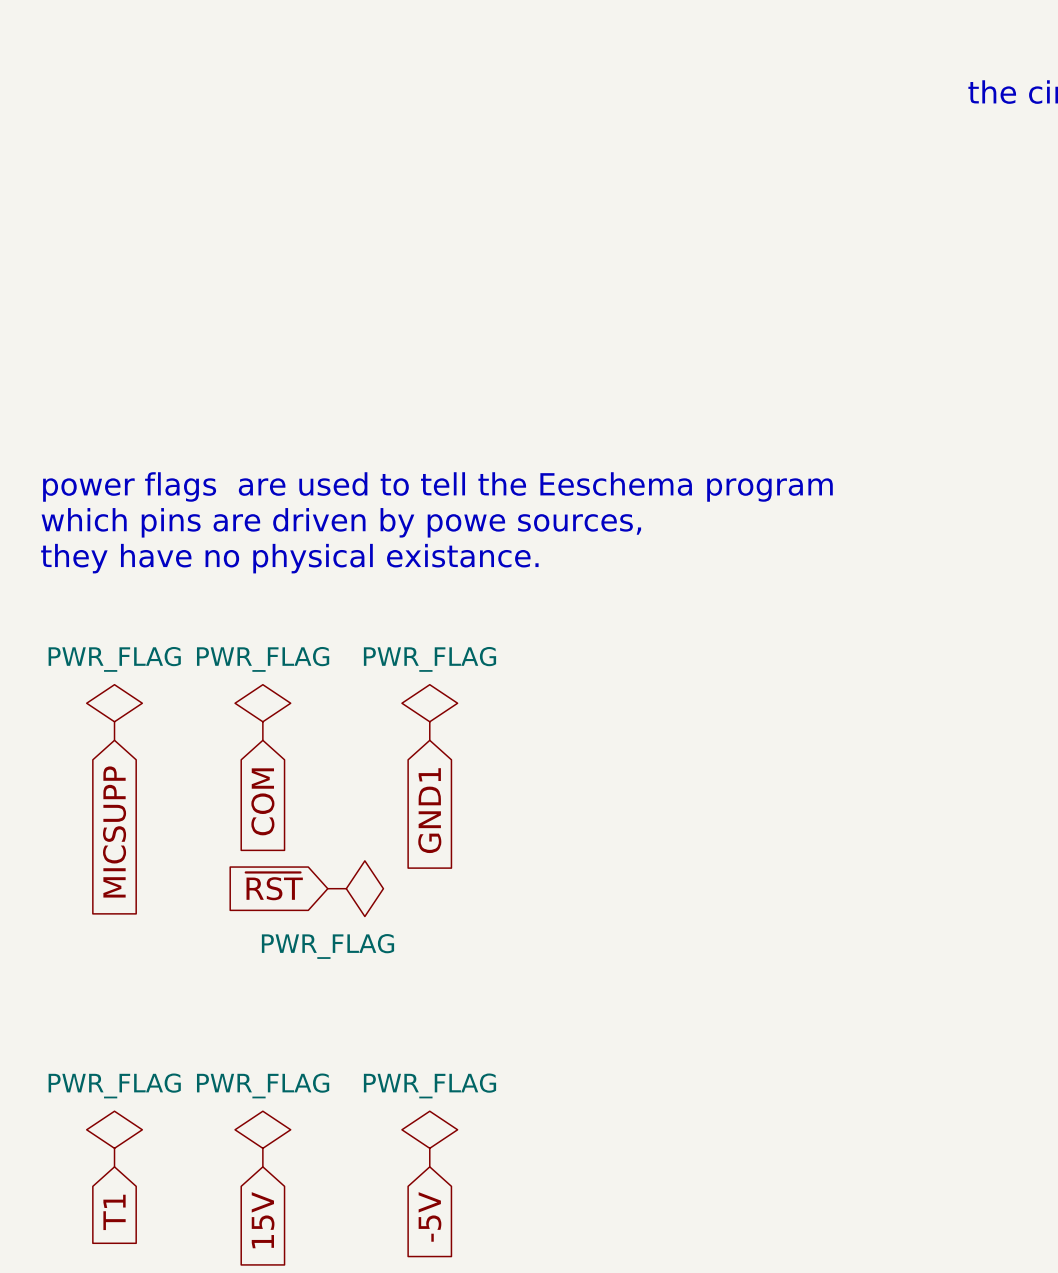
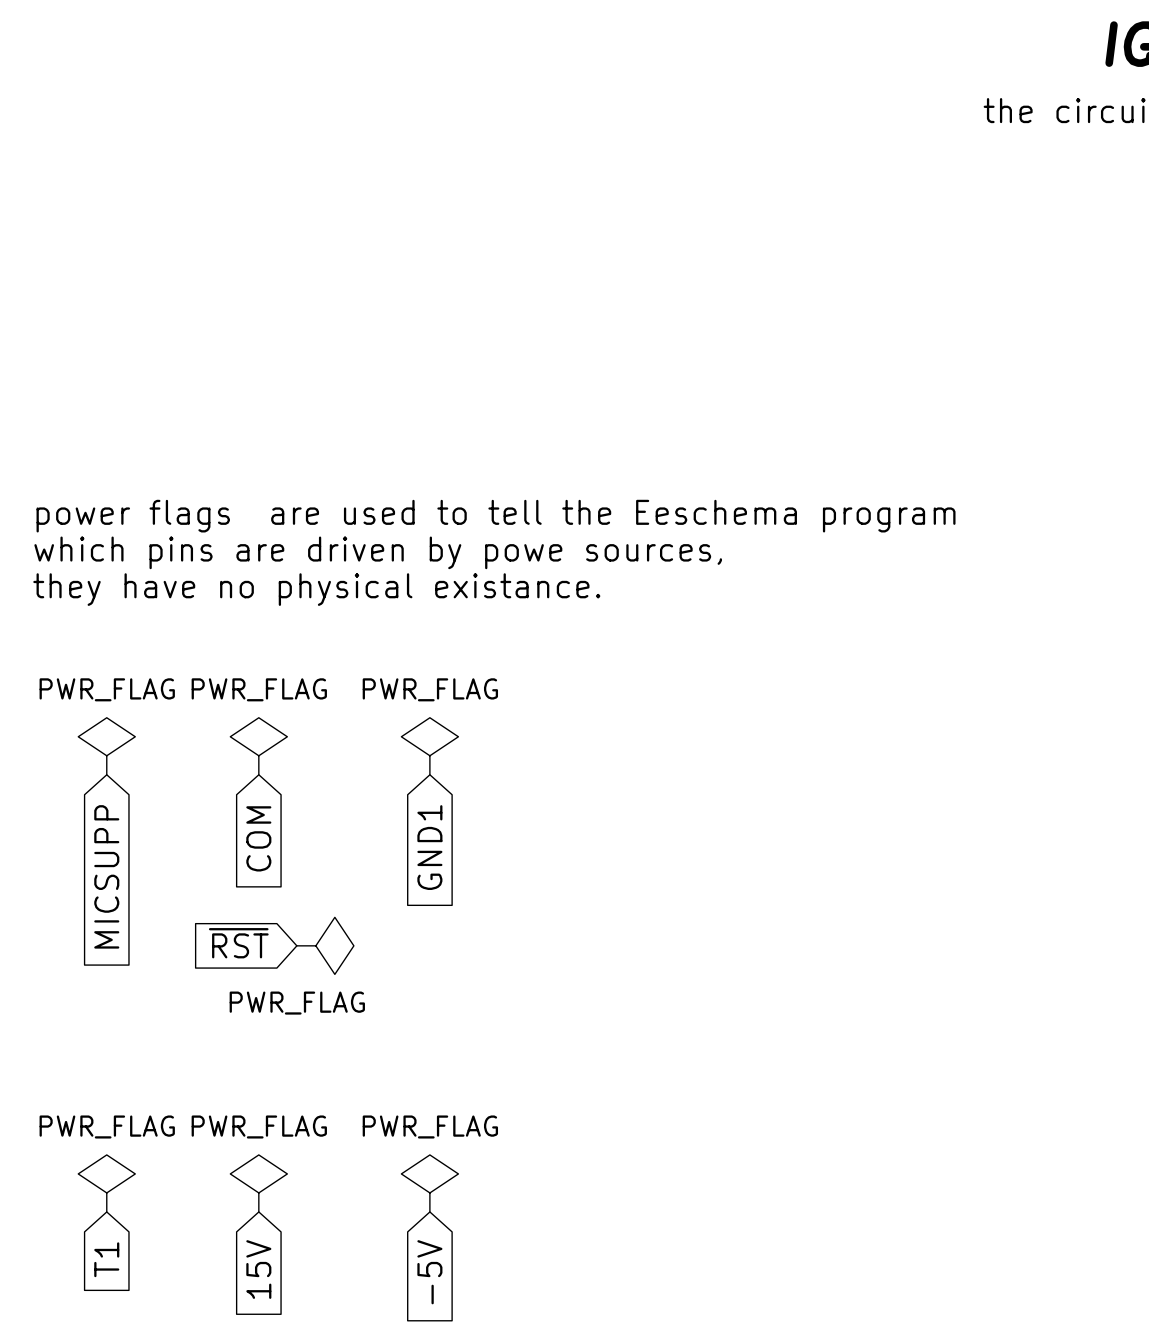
global label position: ~{RST} (274, 886) -> ~{RST} (238, 943)
power symbol position: PWR_FLAG (355, 888) -> PWR_FLAG (325, 945)

